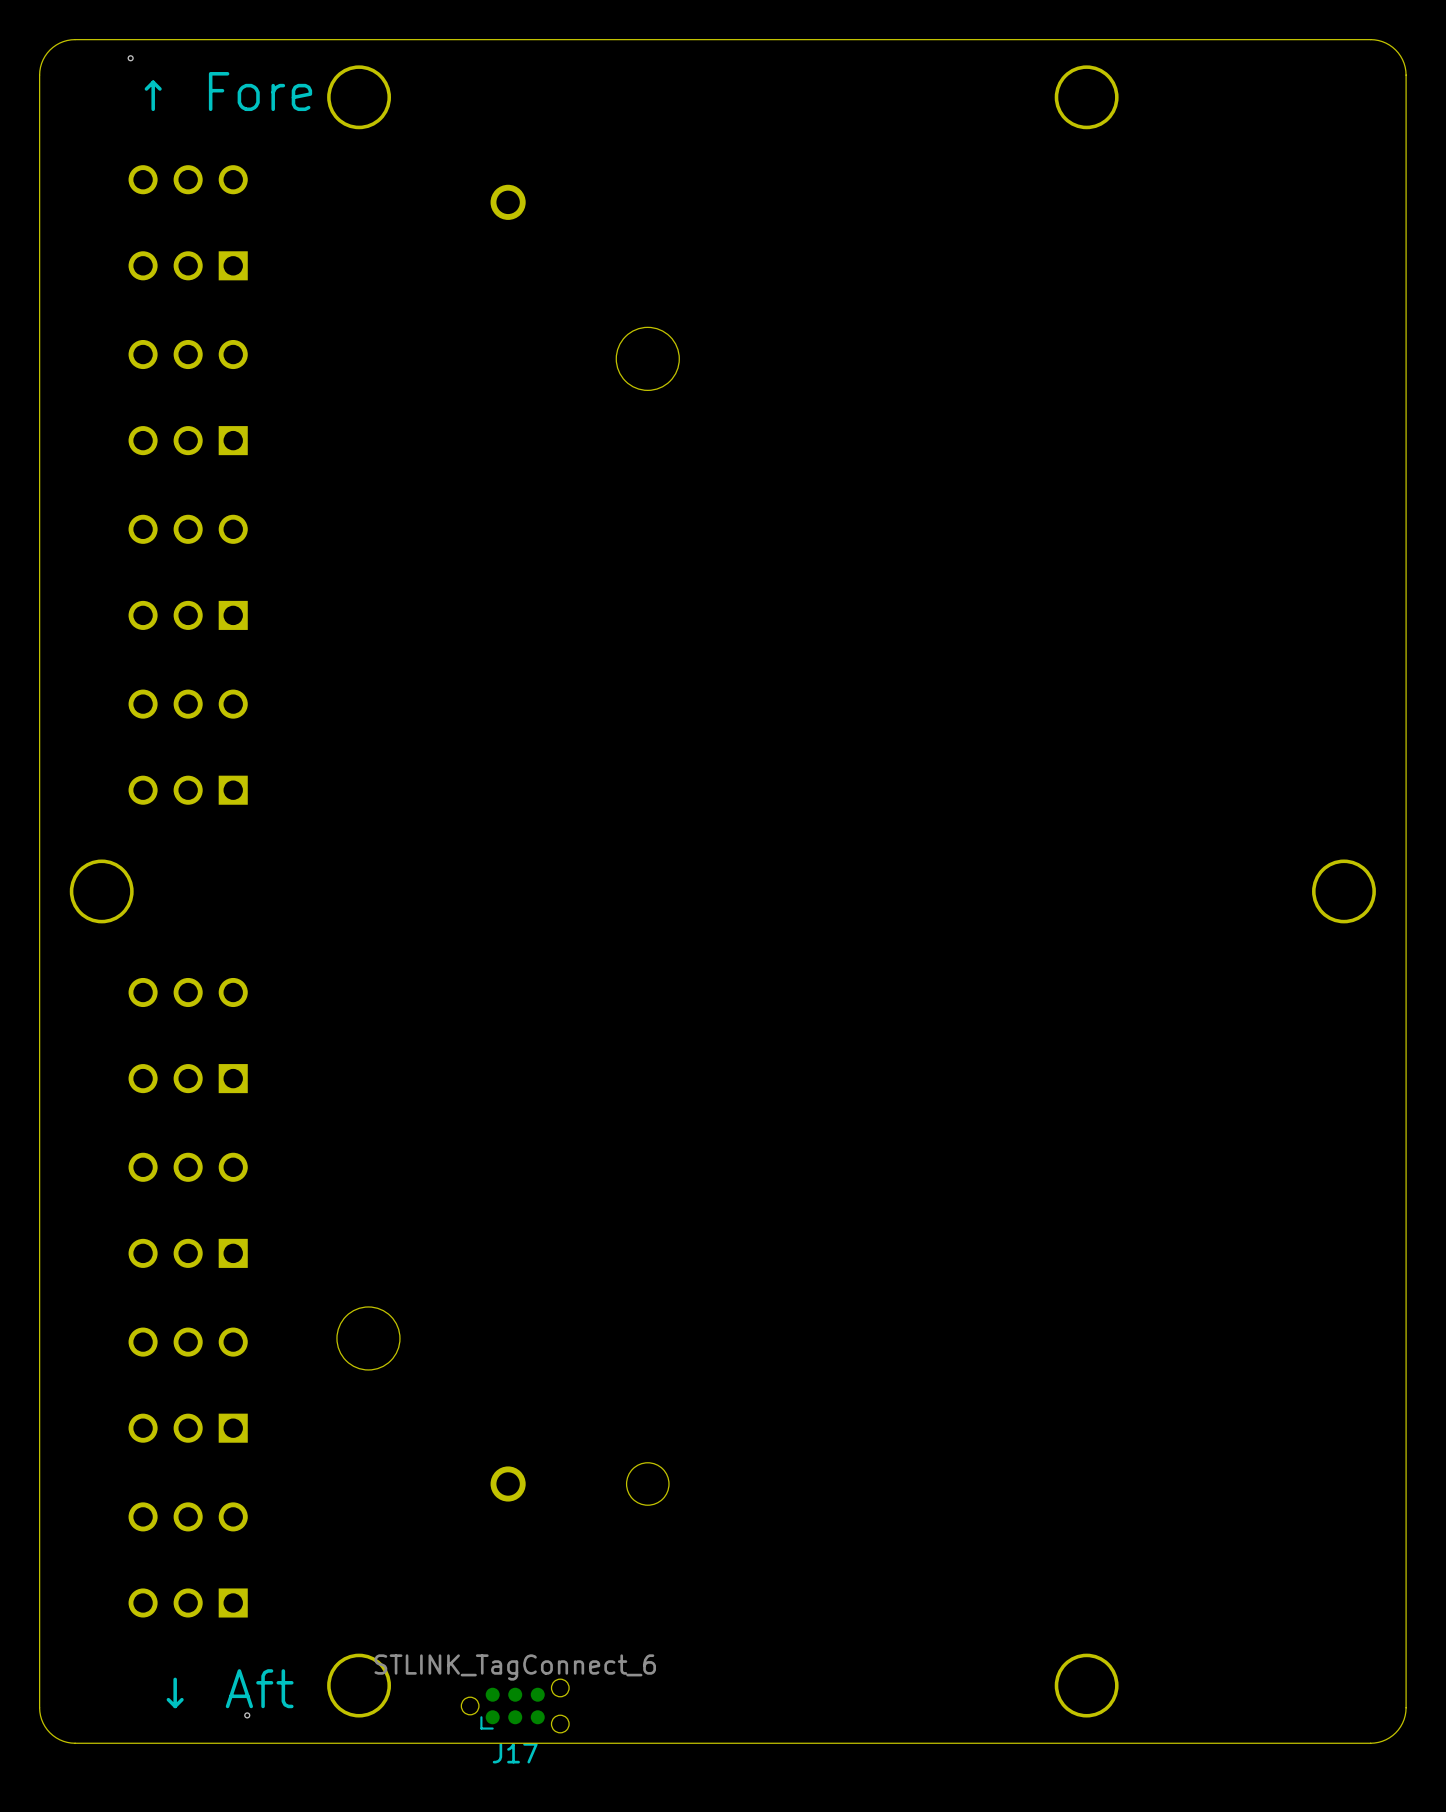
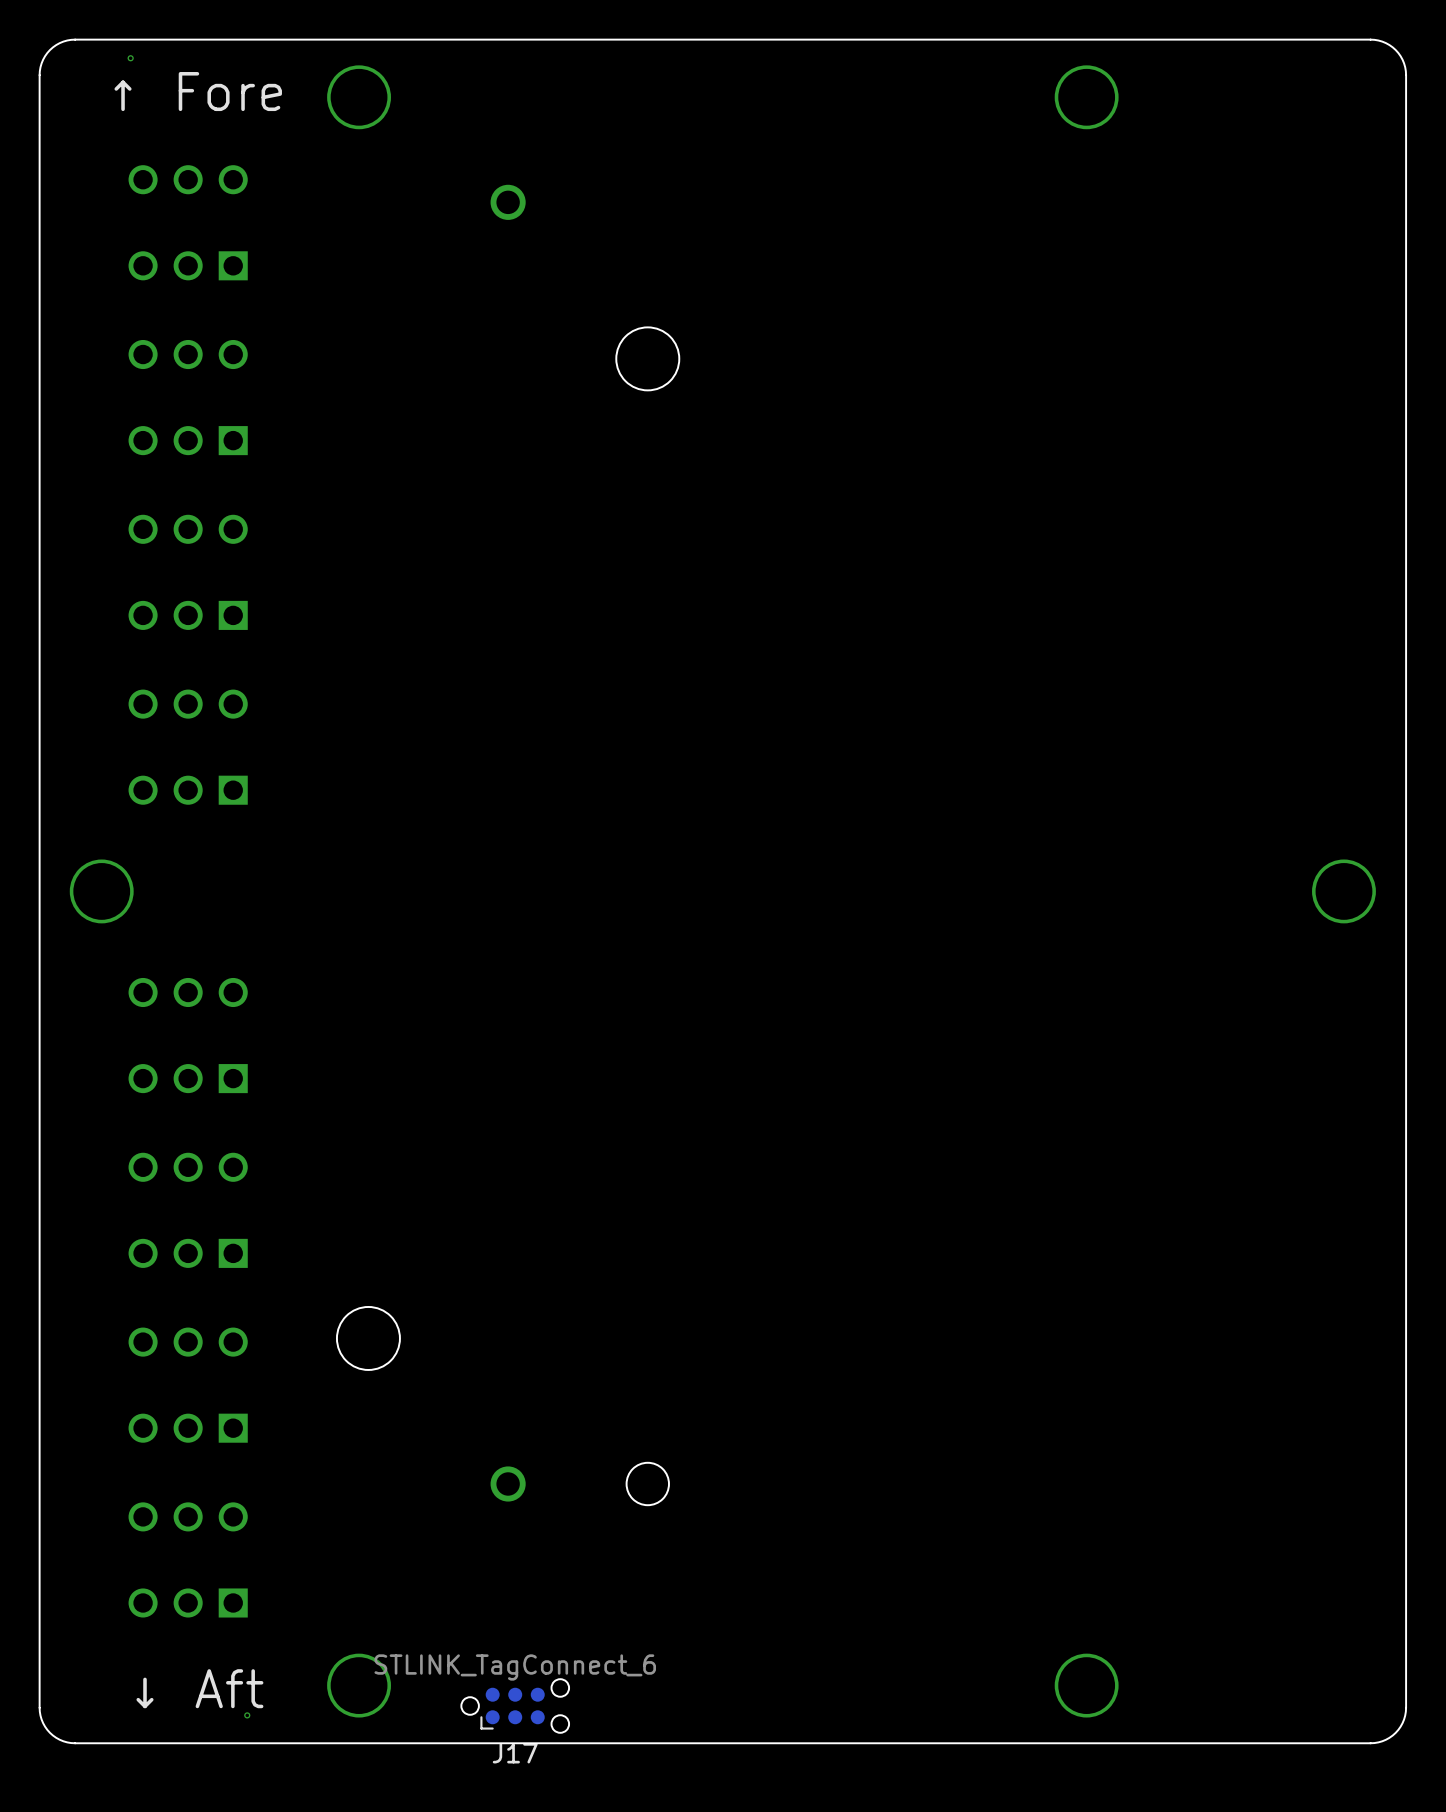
part text position: ↑ Fore (228, 91) -> ↑ Fore (198, 91)
part text position: ↓ Aft (230, 1688) -> ↓ Aft (199, 1688)

